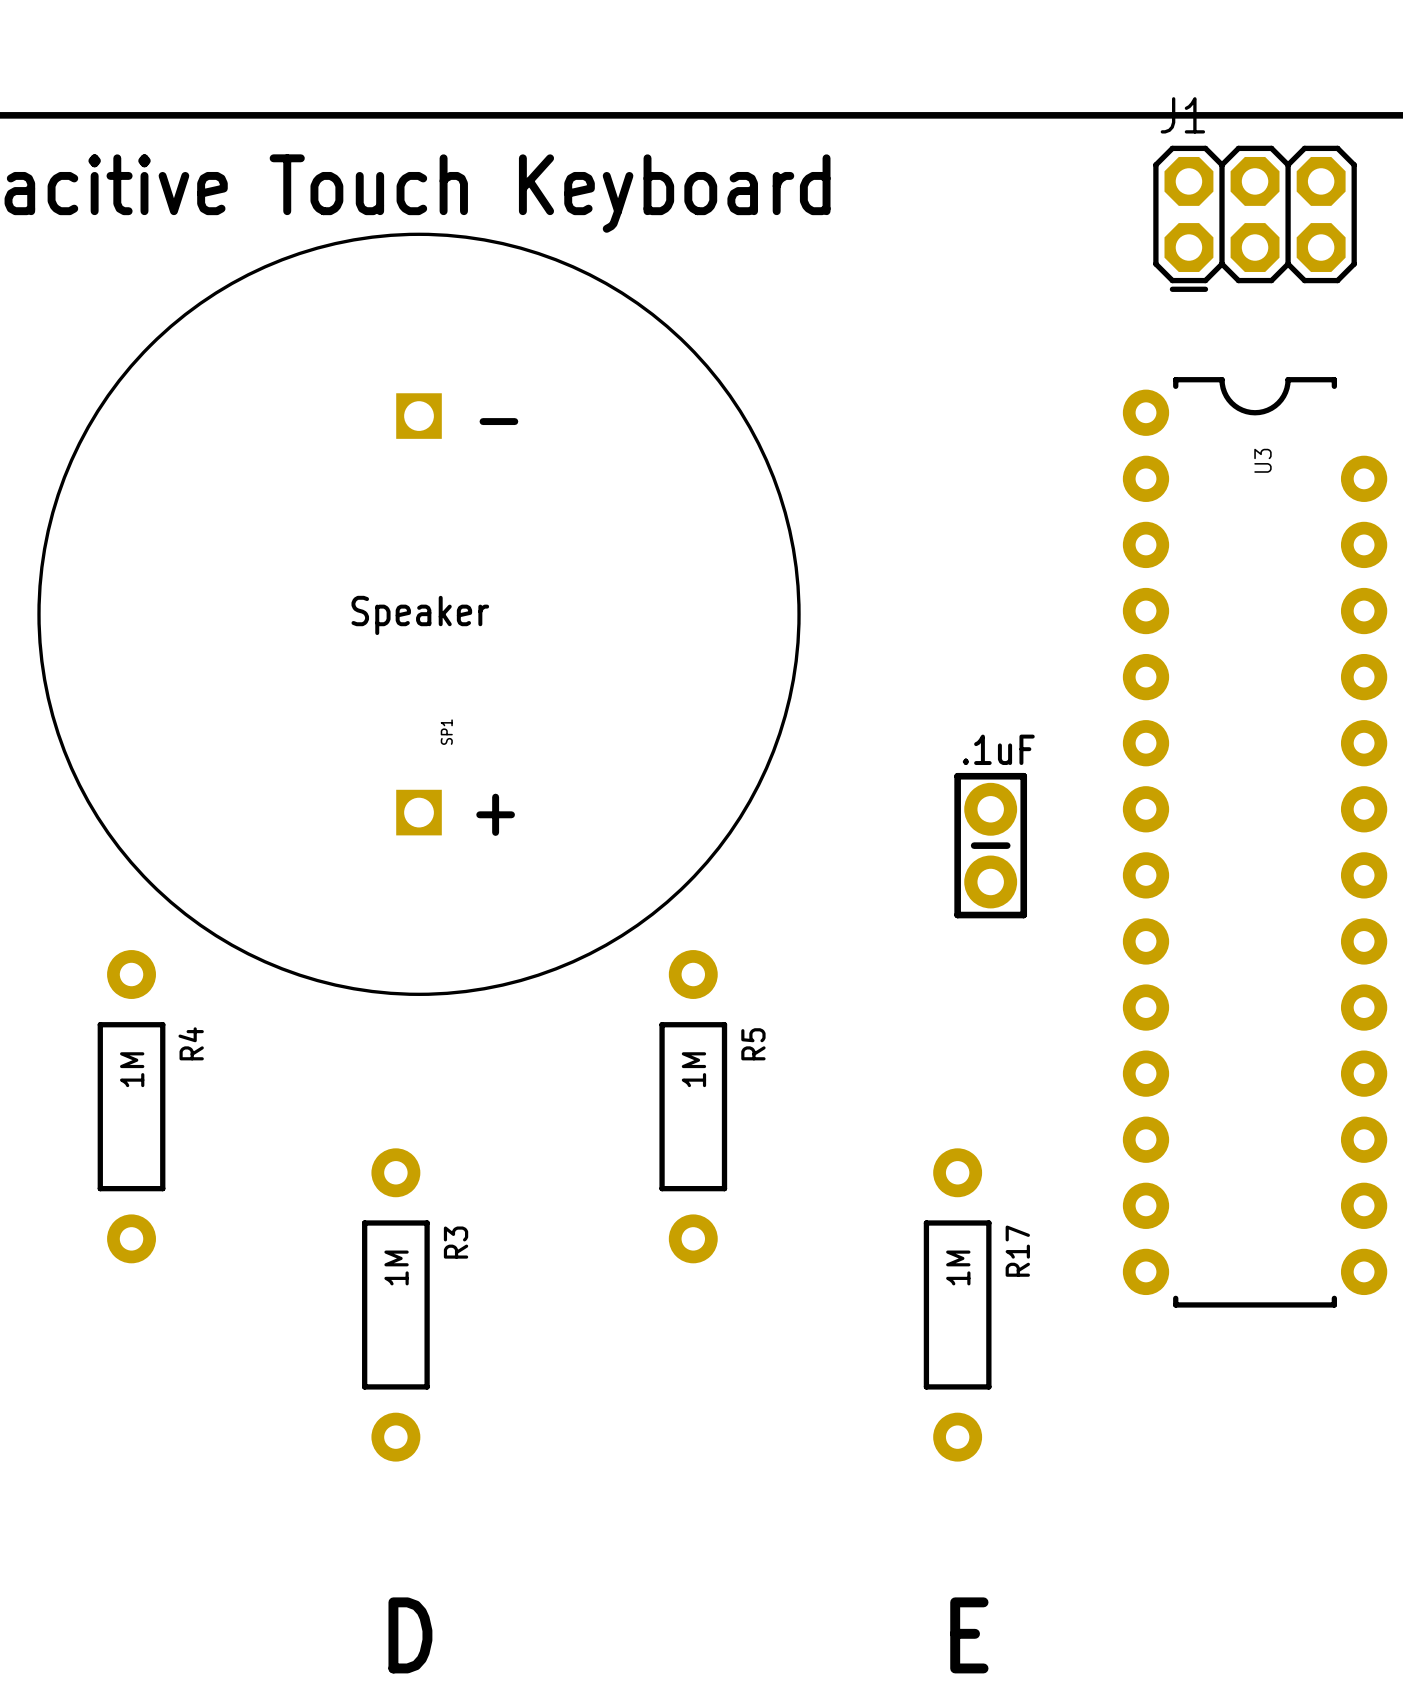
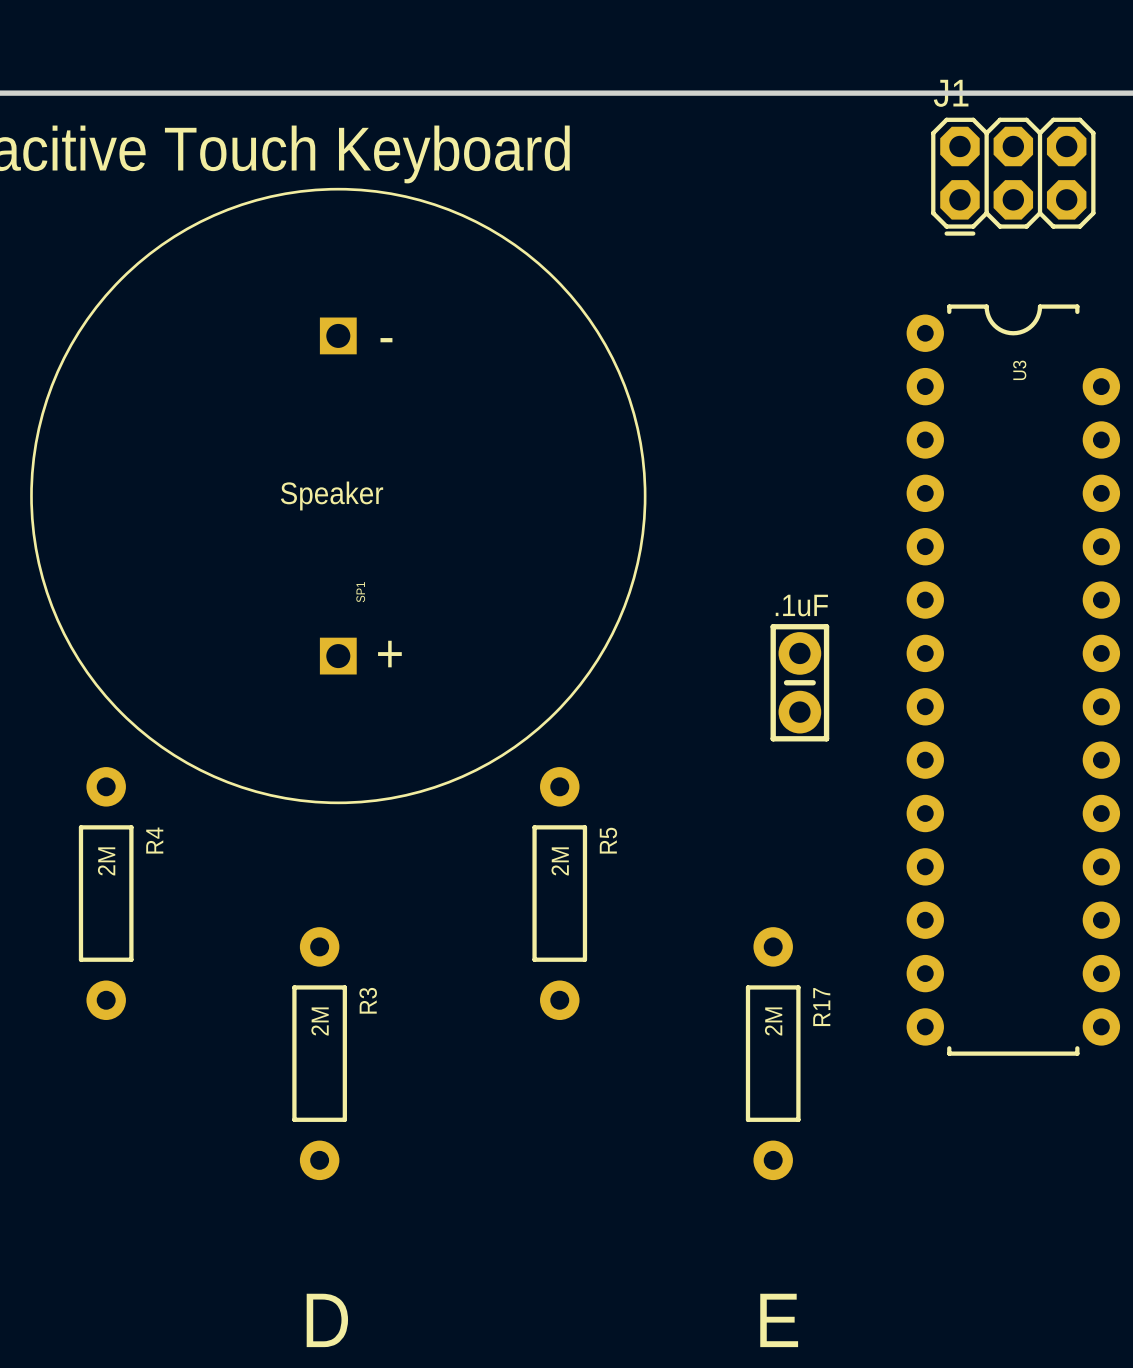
R4 value: 1M (132, 1069) -> 2M (106, 861)
R5 value: 1M (693, 1069) -> 2M (560, 861)
R3 value: 1M (396, 1267) -> 2M (320, 1021)
R17 value: 1M (958, 1267) -> 2M (773, 1021)

